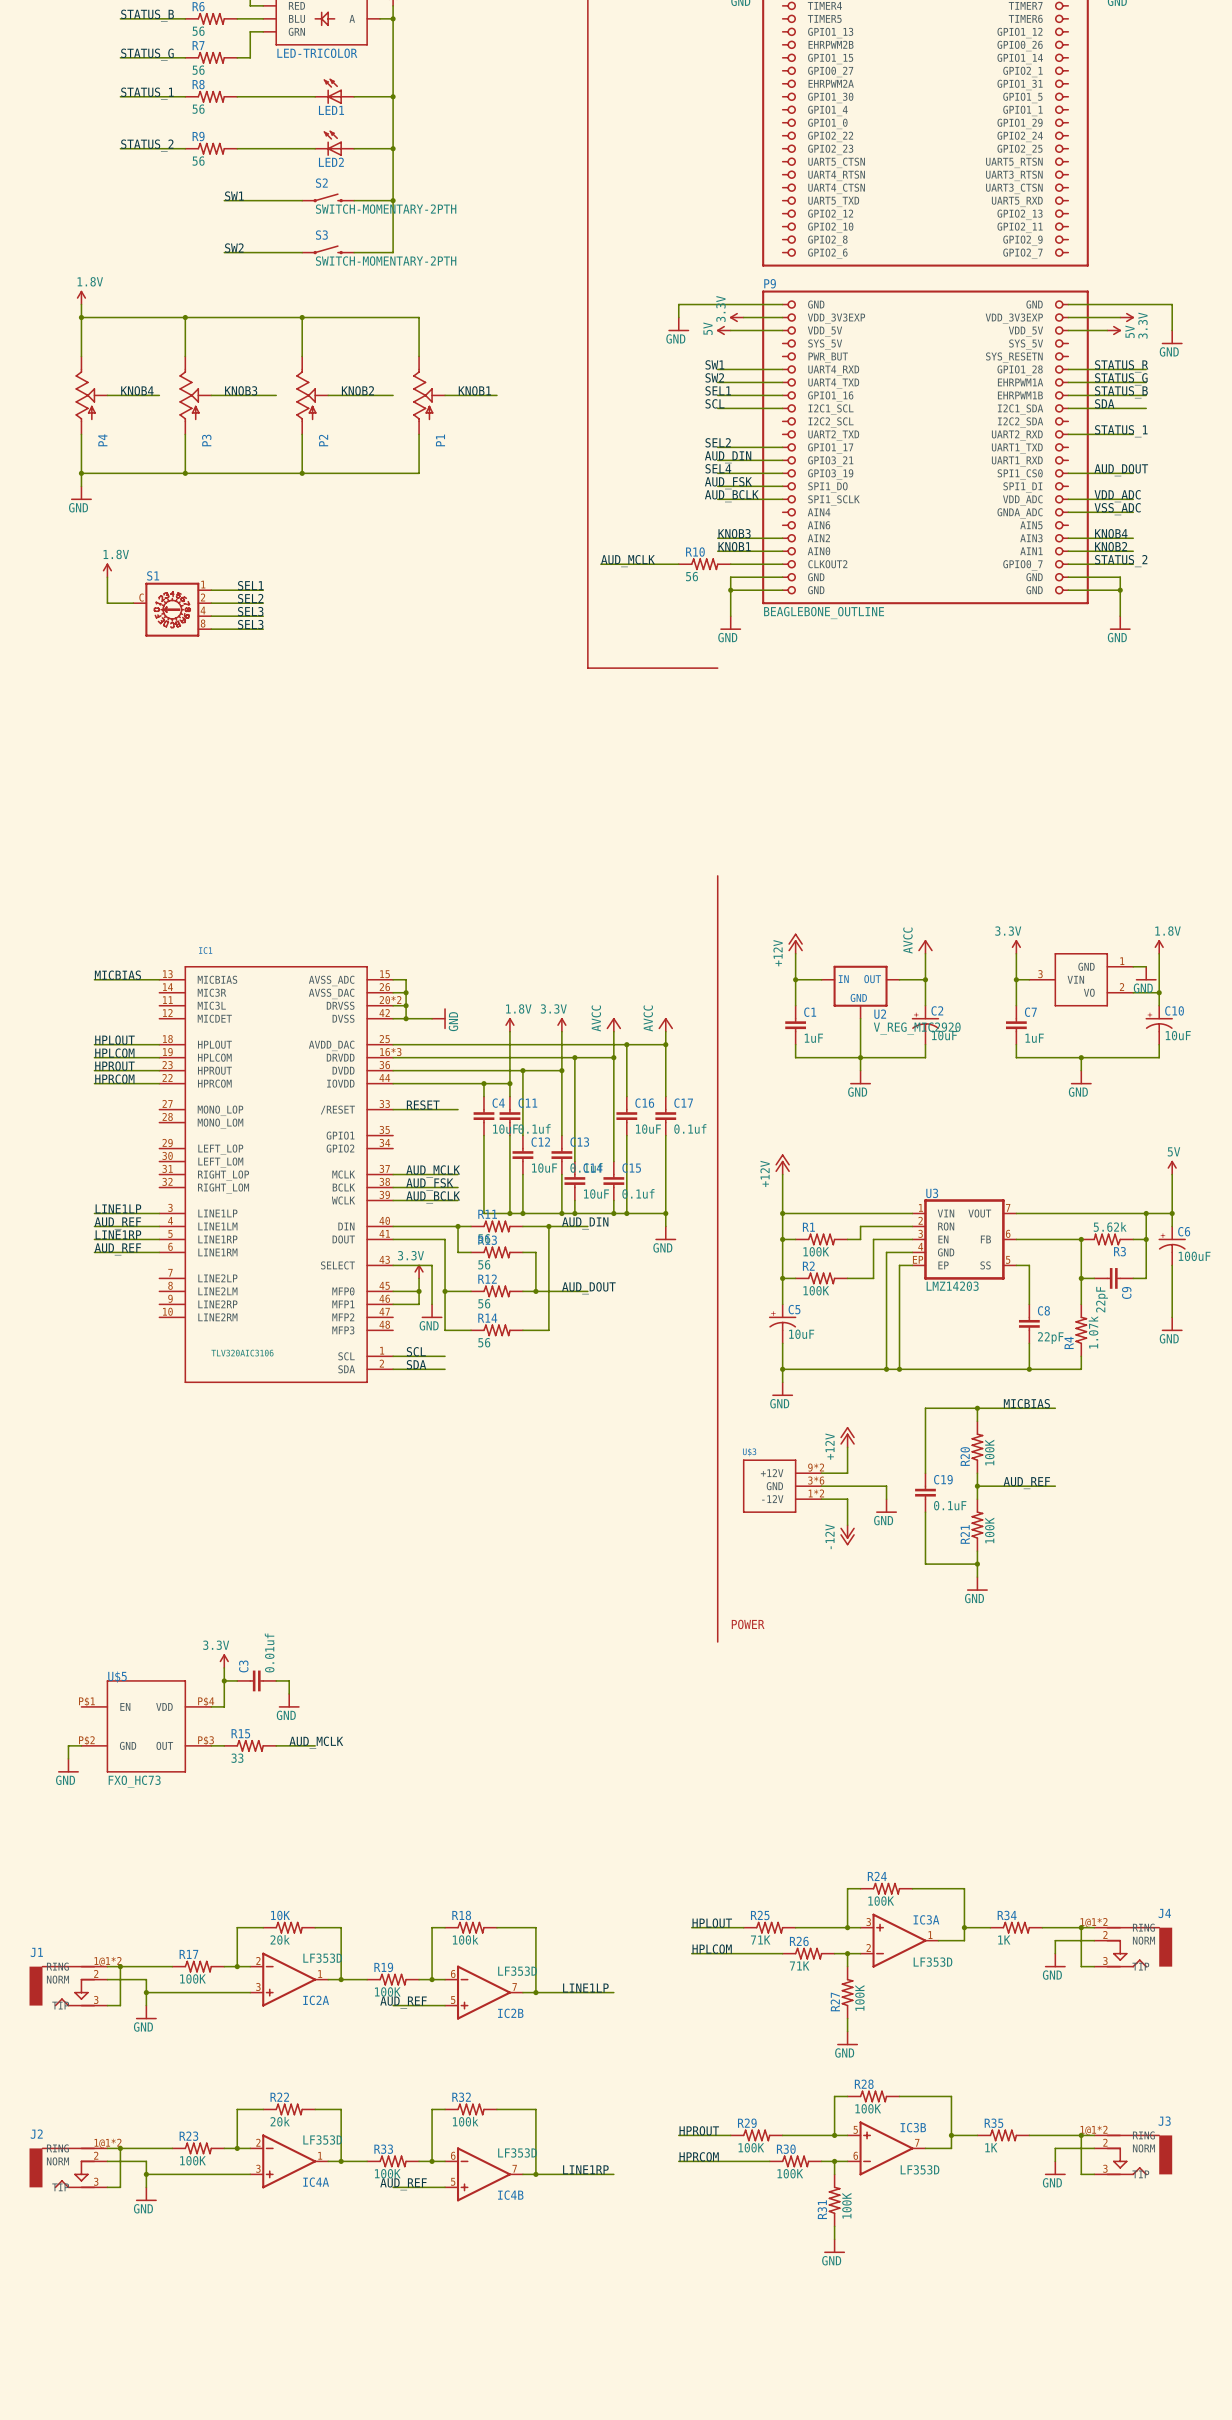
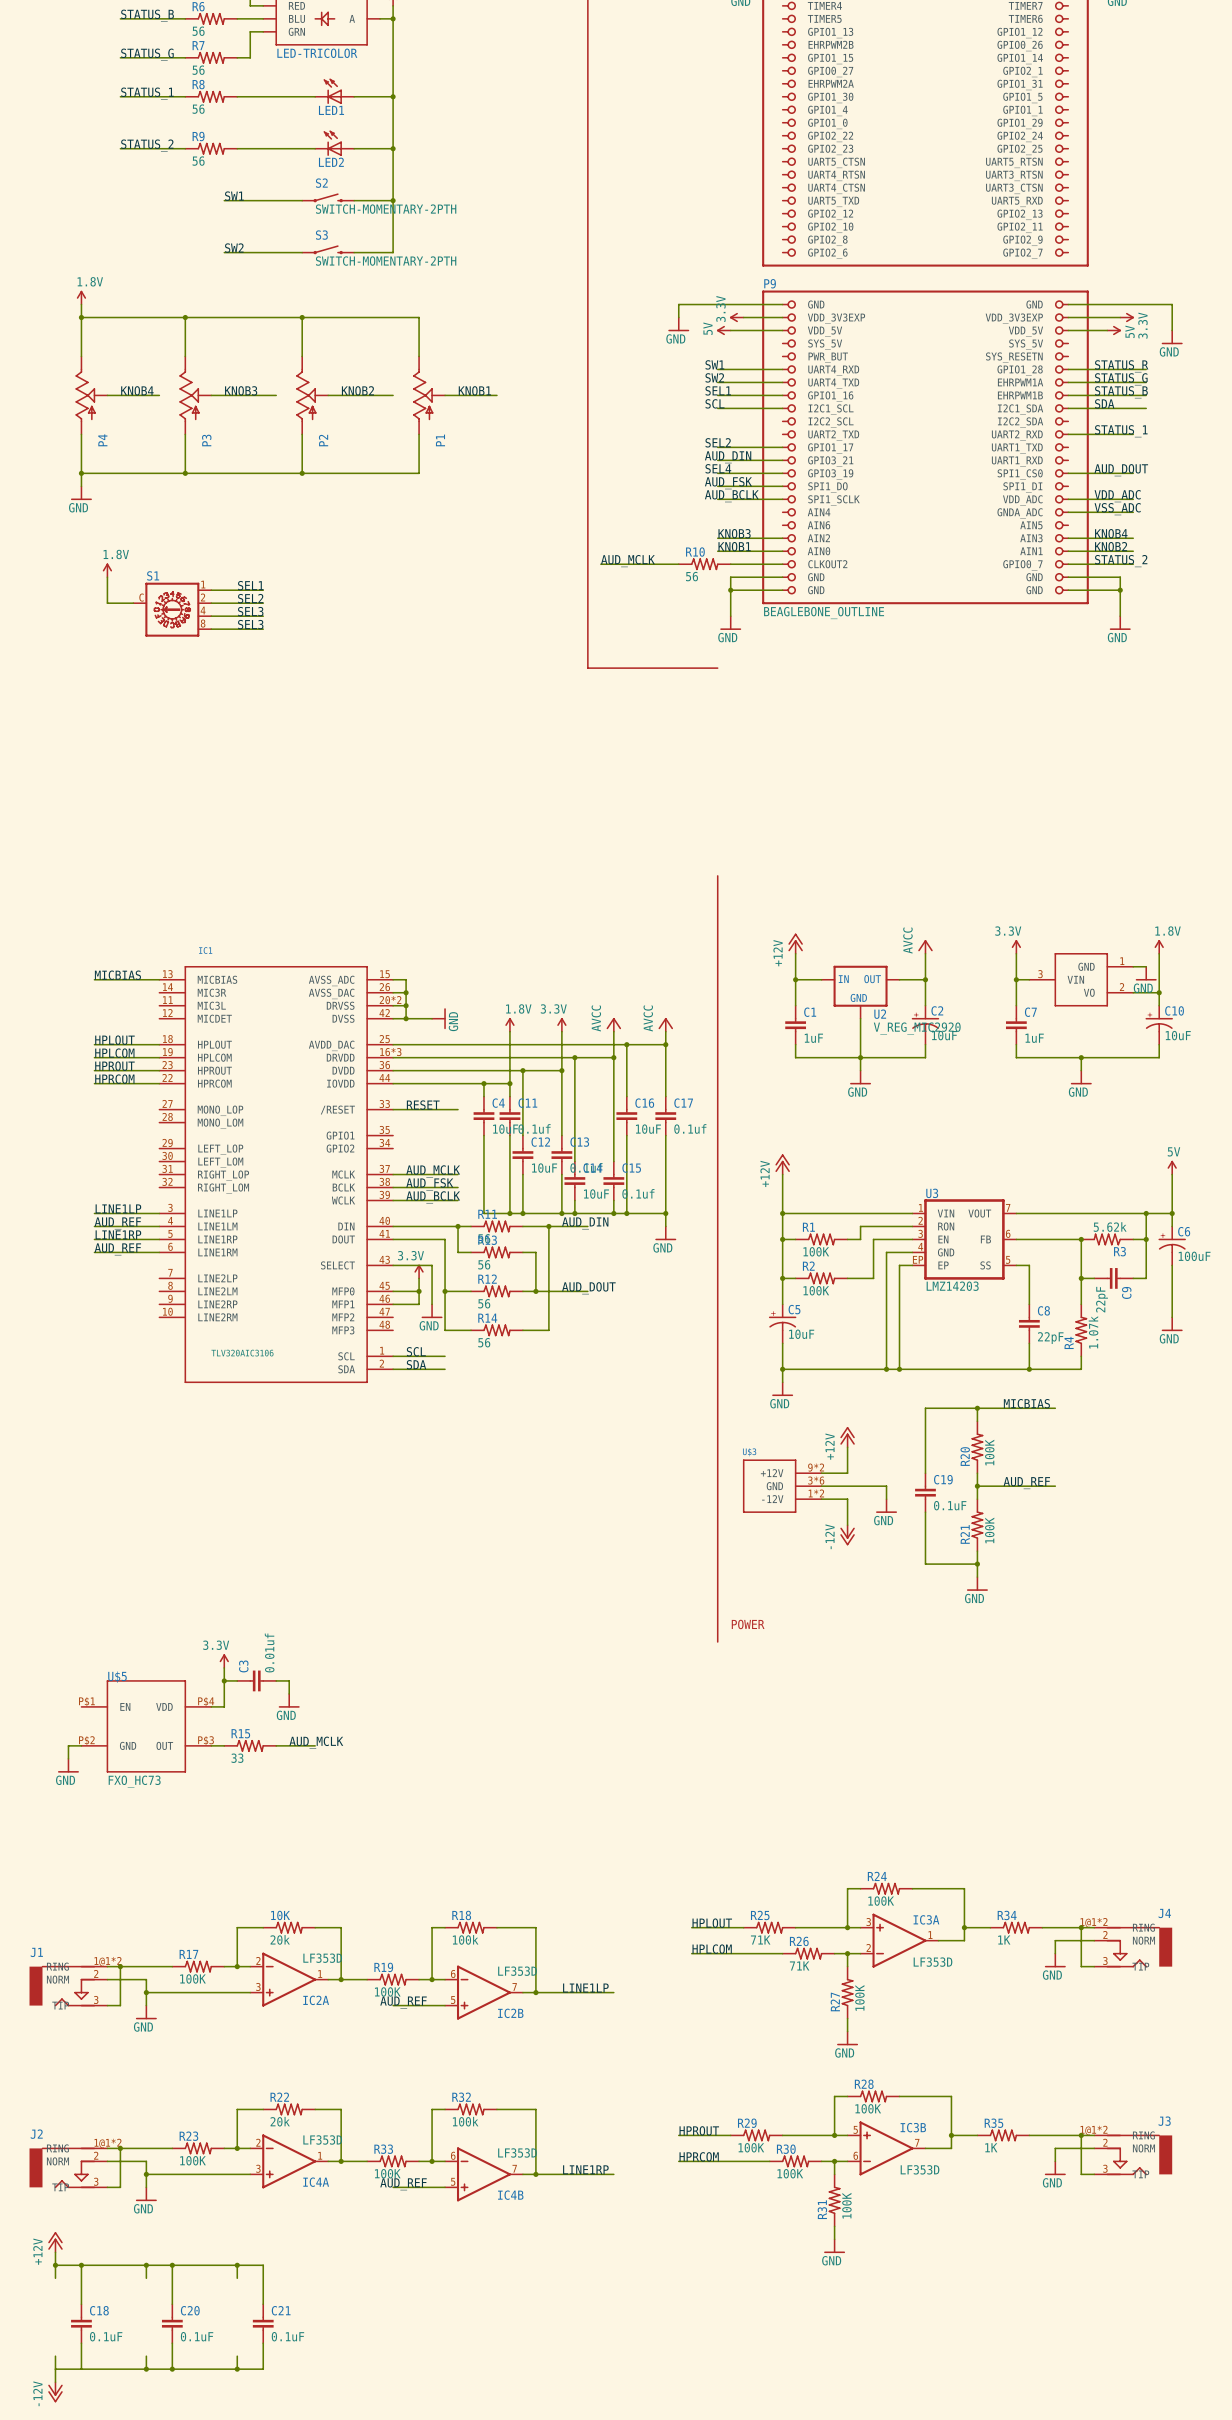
power symbol: none -> +12V (55, 2242)
wire: none -> (55, 2252) (55, 2278)
wire: none -> (55, 2265) (263, 2265) (263, 2304)
junction: none -> (55, 2265)
wire: none -> (81, 2265) (81, 2304)
junction: none -> (81, 2265)
wire: none -> (146, 2265) (146, 2278)
junction: none -> (146, 2265)
wire: none -> (172, 2265) (172, 2304)
junction: none -> (172, 2265)
wire: none -> (237, 2265) (237, 2278)
junction: none -> (237, 2265)
C18: none -> 0.1uF (81, 2323)
C20: none -> 0.1uF (172, 2323)
C21: none -> 0.1uF (263, 2323)
wire: none -> (81, 2343) (81, 2369)
wire: none -> (172, 2343) (172, 2369)
wire: none -> (263, 2343) (263, 2369) (55, 2369)
wire: none -> (55, 2356) (55, 2382)
wire: none -> (146, 2356) (146, 2369)
wire: none -> (237, 2356) (237, 2369)
junction: none -> (146, 2369)
junction: none -> (172, 2369)
junction: none -> (237, 2369)
power symbol: none -> -12V (55, 2392)

